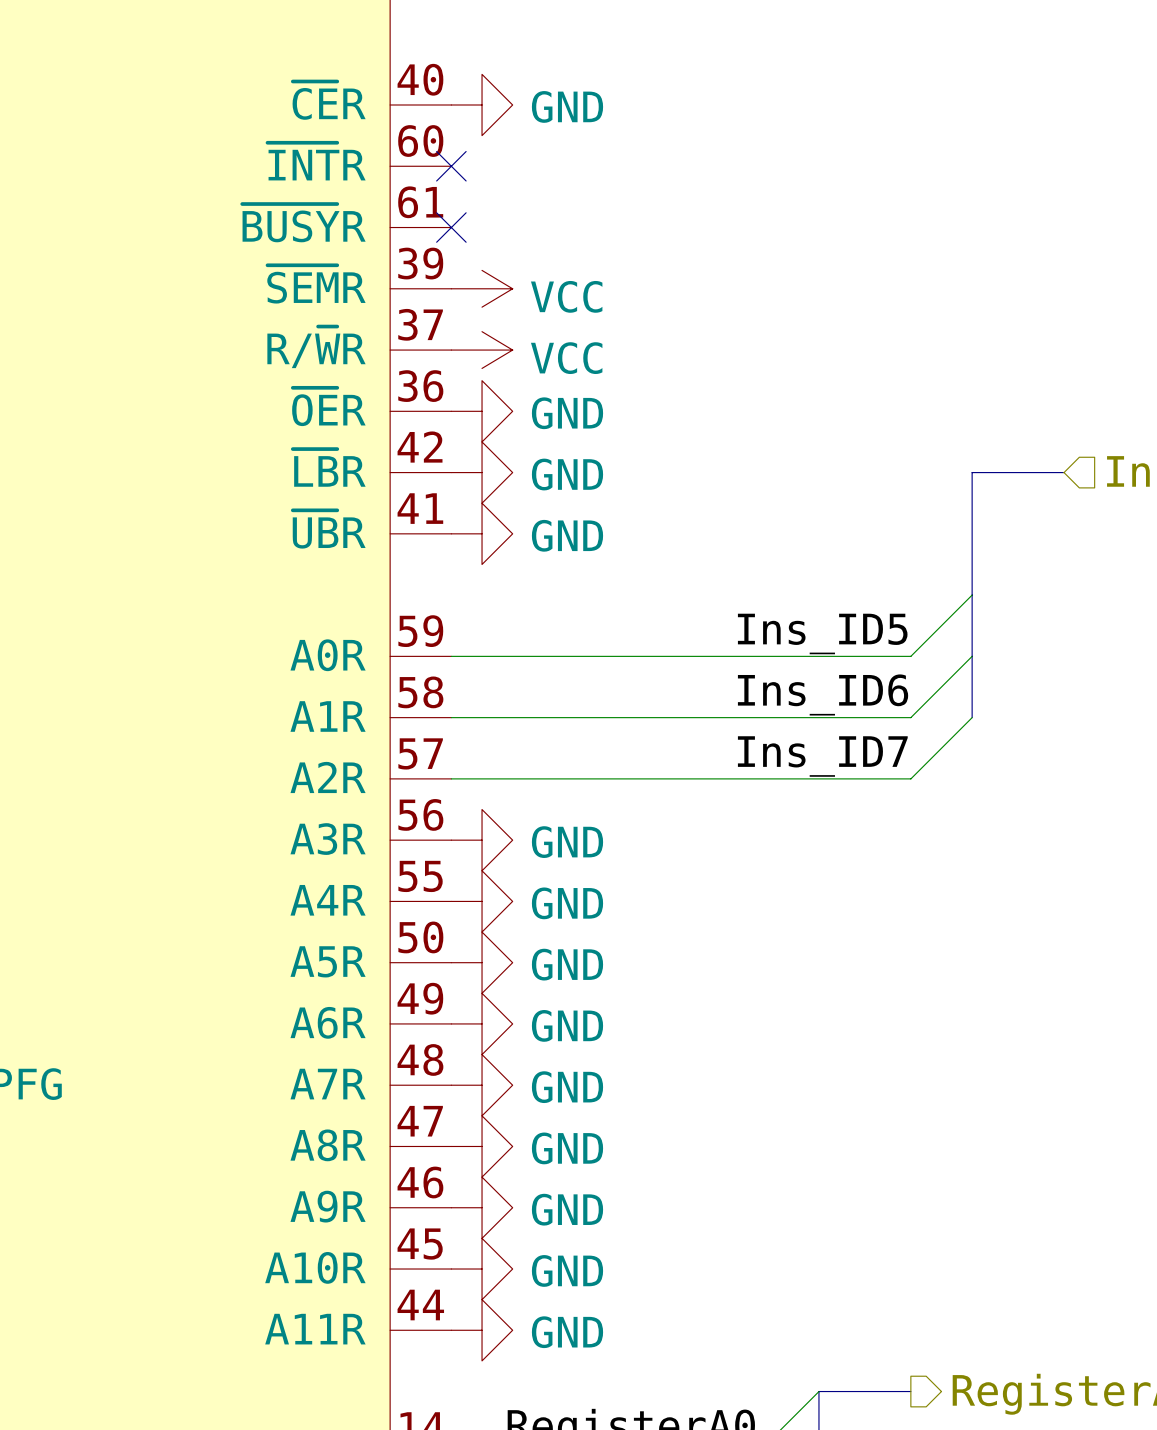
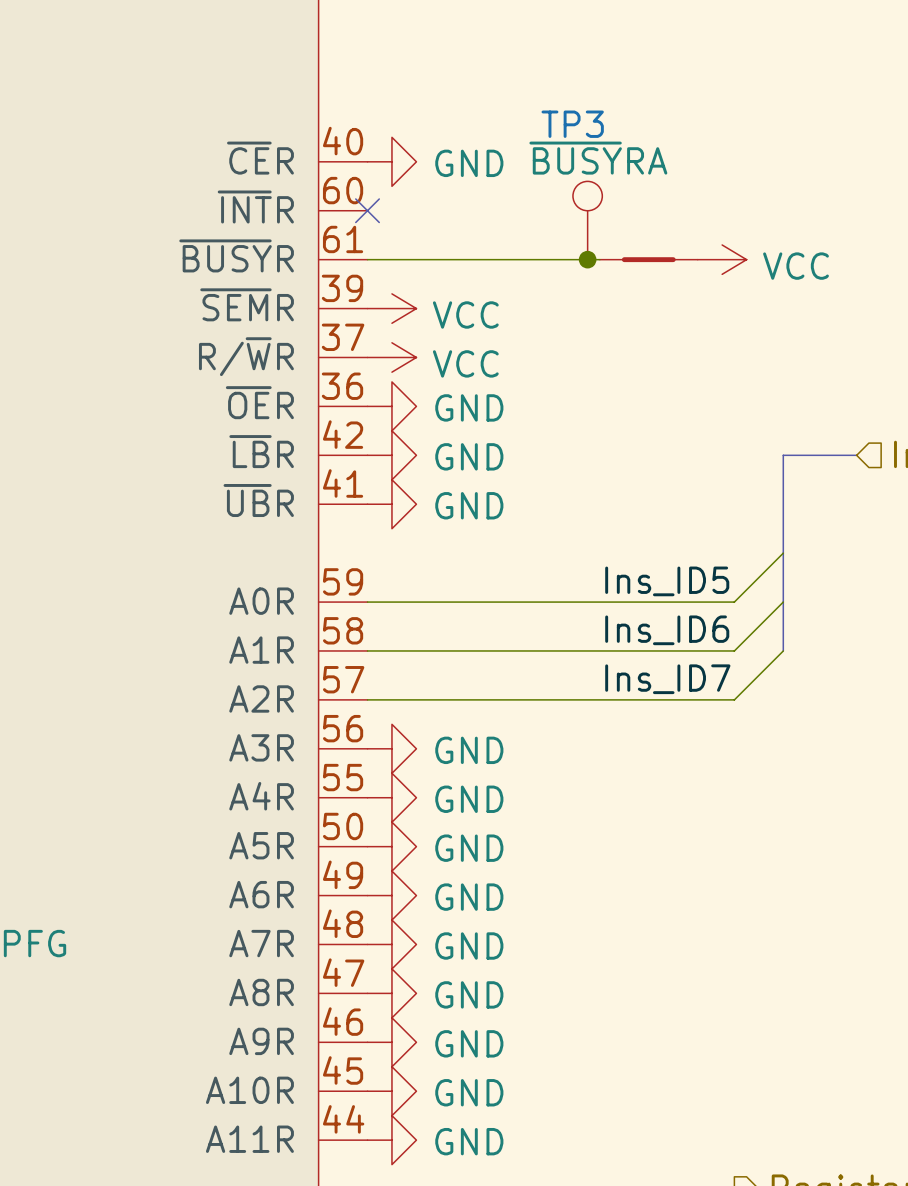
TP3: none -> ~{BUSY}RA (587, 220)
wire: none -> (367, 259) (599, 259)
no-connect mark: (451, 227) -> none
junction: none -> (587, 259)
part: none -> (648, 259)
power symbol: none -> VCC (722, 259)

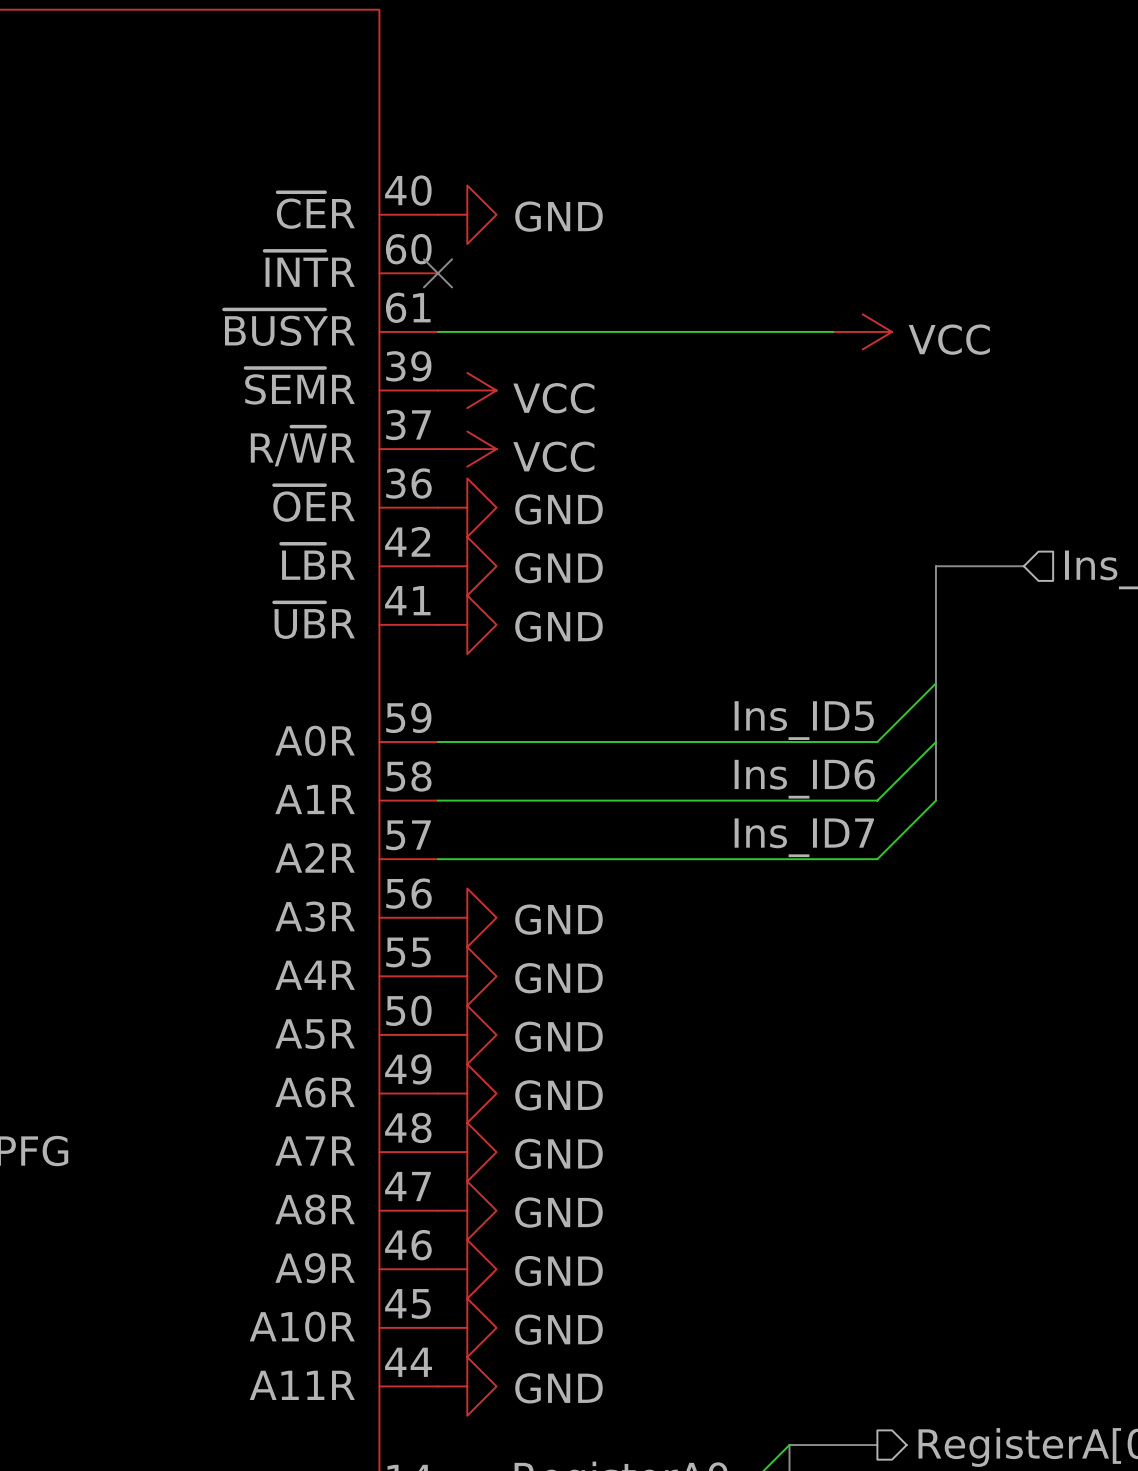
TP3: ~{BUSY}RA (587, 220) -> none
junction: (587, 259) -> none
part: (648, 259) -> none

